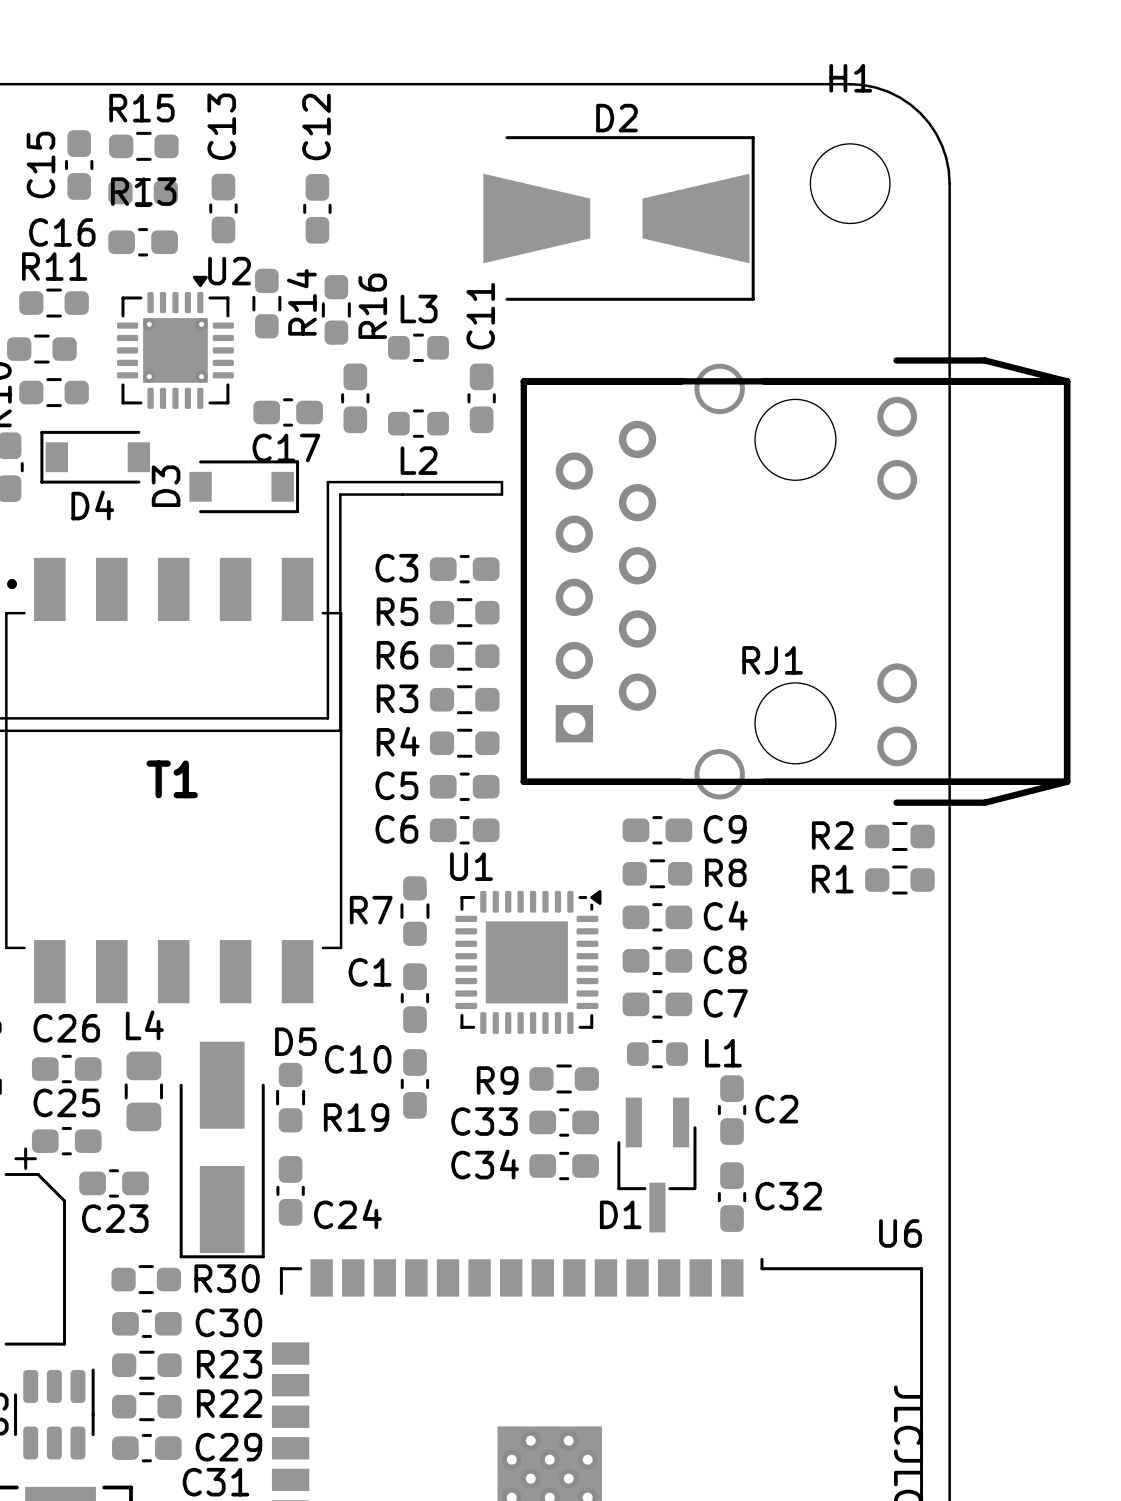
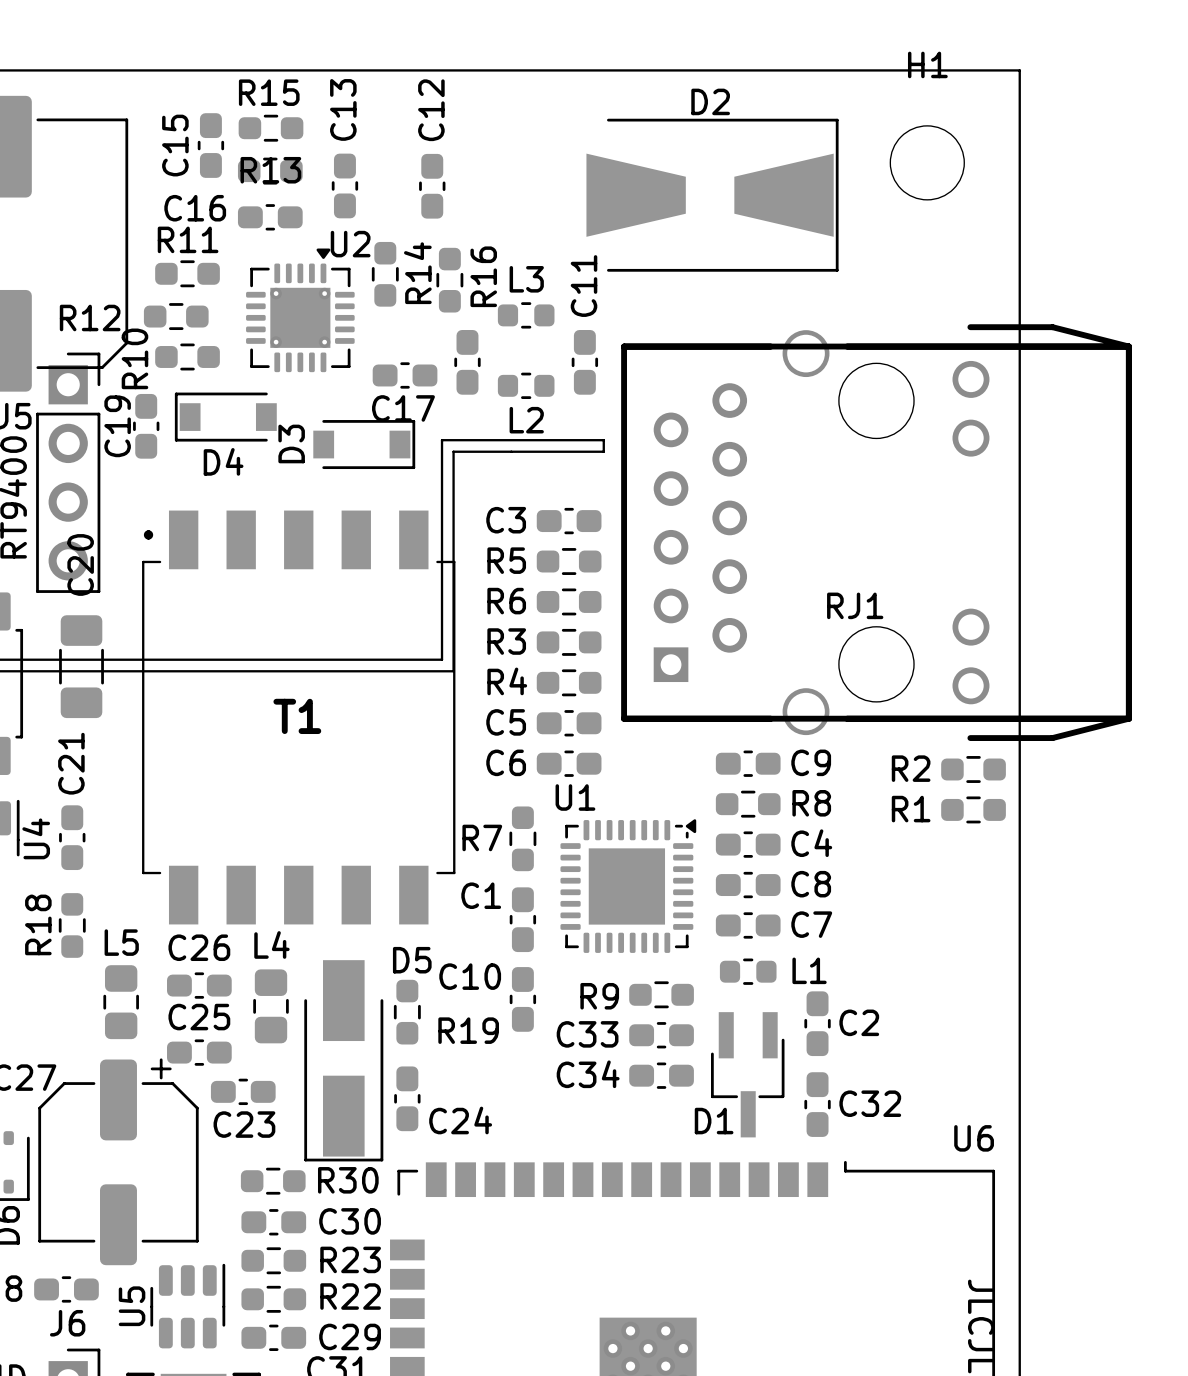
board edge: (850, 84) (863, 85) (888, 91) (899, 97) (920, 113) (936, 133) (942, 145) (948, 170) (949, 183) -> (927, 70) (1019, 70) (1019, 162)

